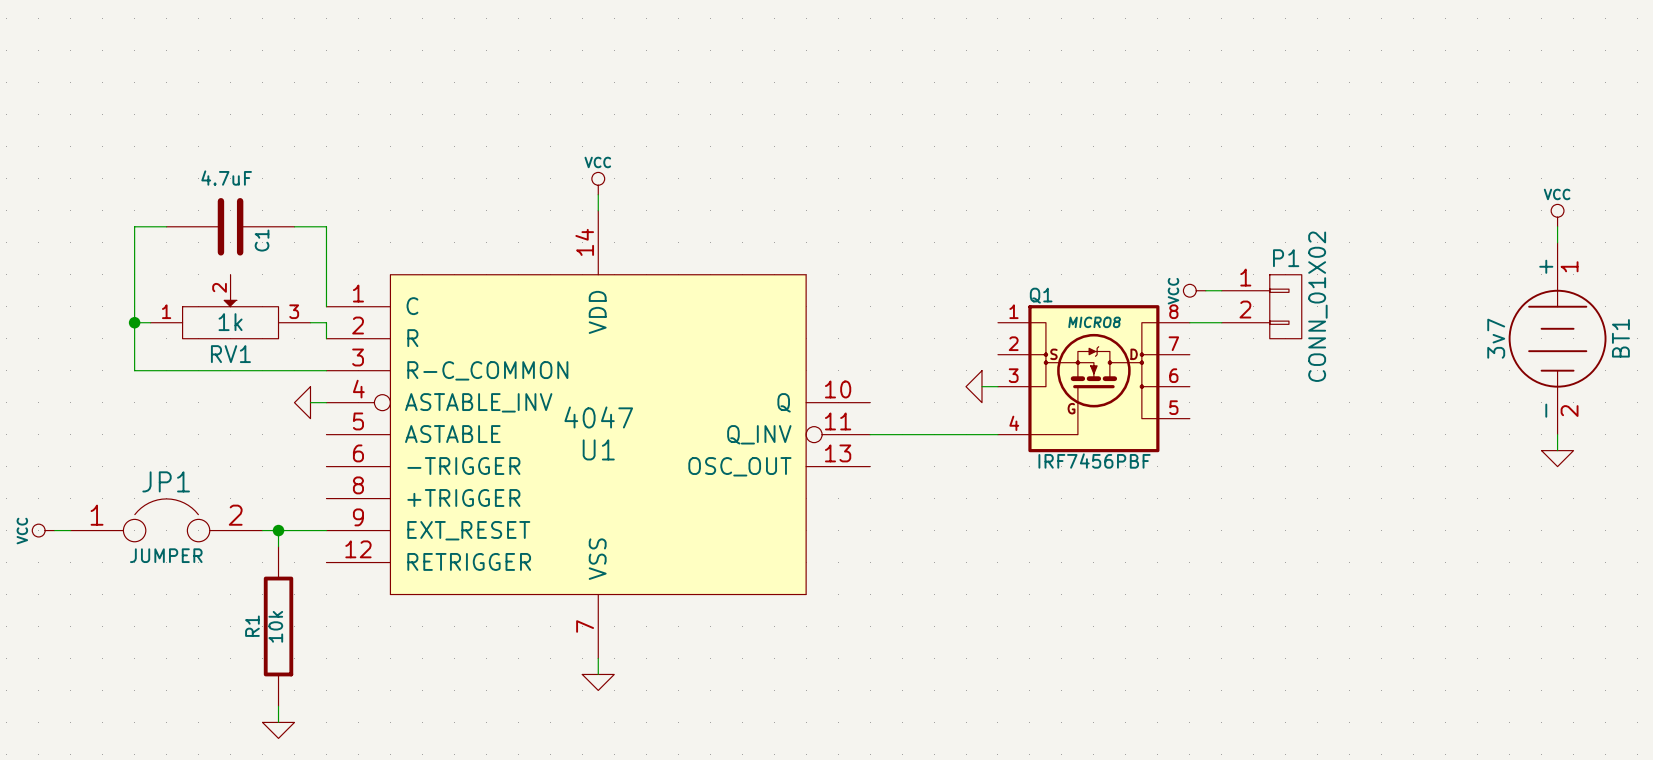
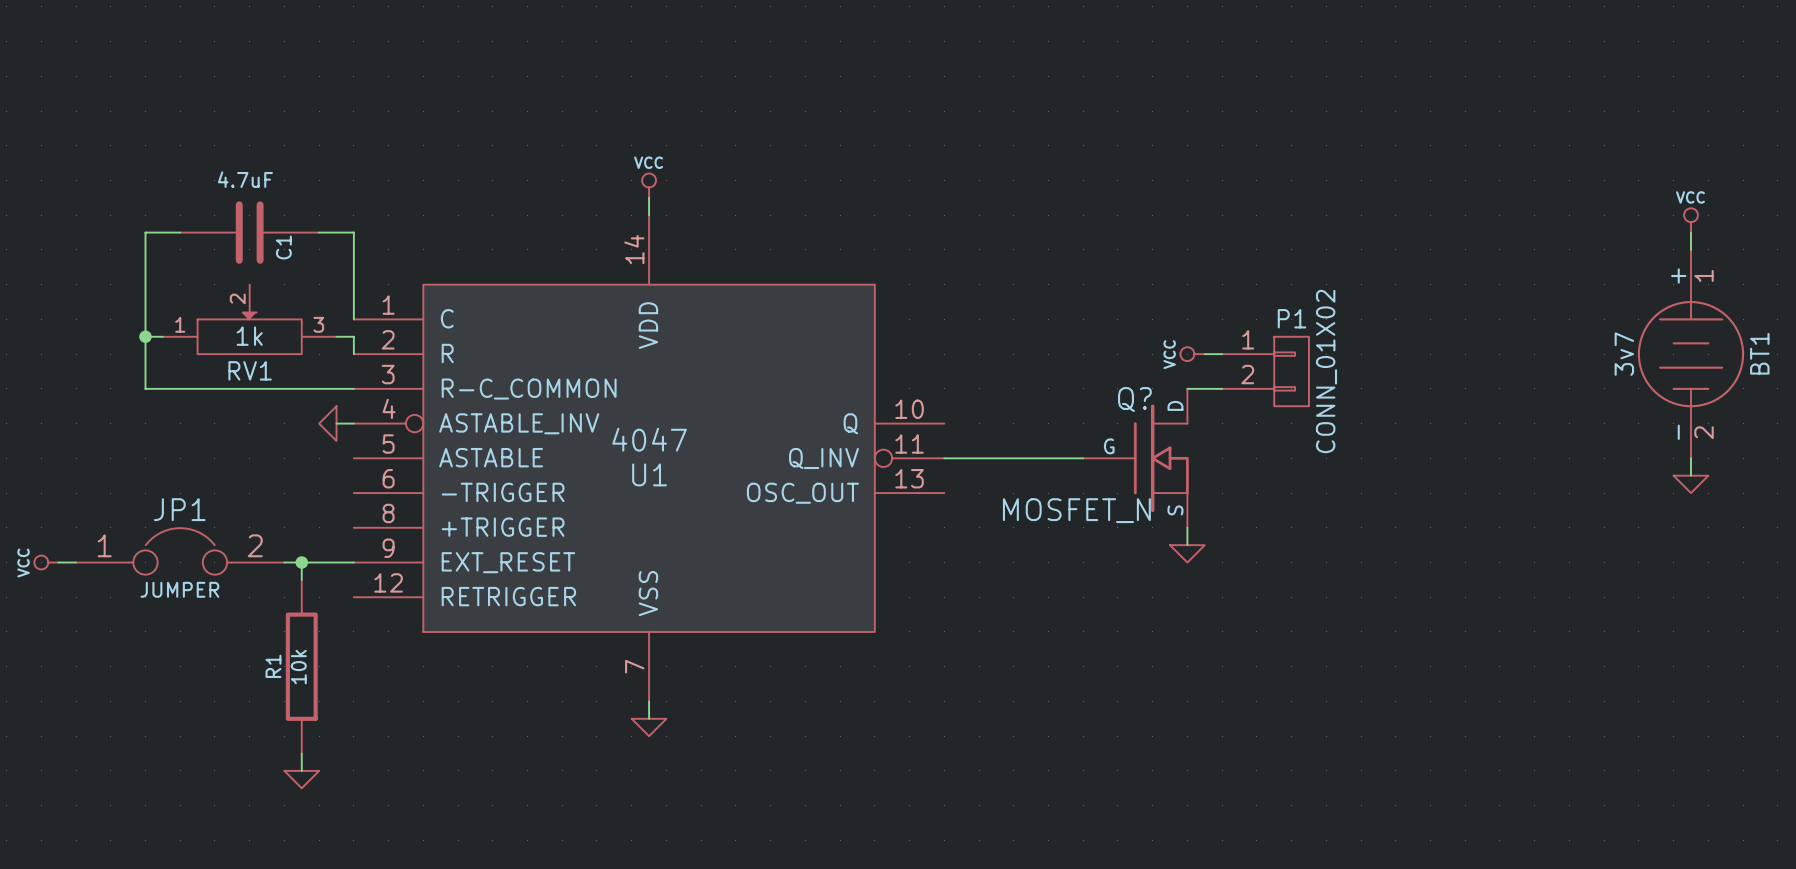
power symbol position: VCC (1194, 290) -> VCC (1192, 354)
P1 position: (1261, 306) -> (1265, 371)
Q1: IRF7456PBF (1093, 378) -> none
power symbol rotation: 0° (974, 386) -> 90° counterclockwise (1187, 553)
power symbol position: (974, 386) -> (1187, 553)
wire: (981, 386) (997, 386) -> none
Q?: none -> MOSFET_N (1136, 458)
wire: none -> (1187, 527) (1187, 545)

